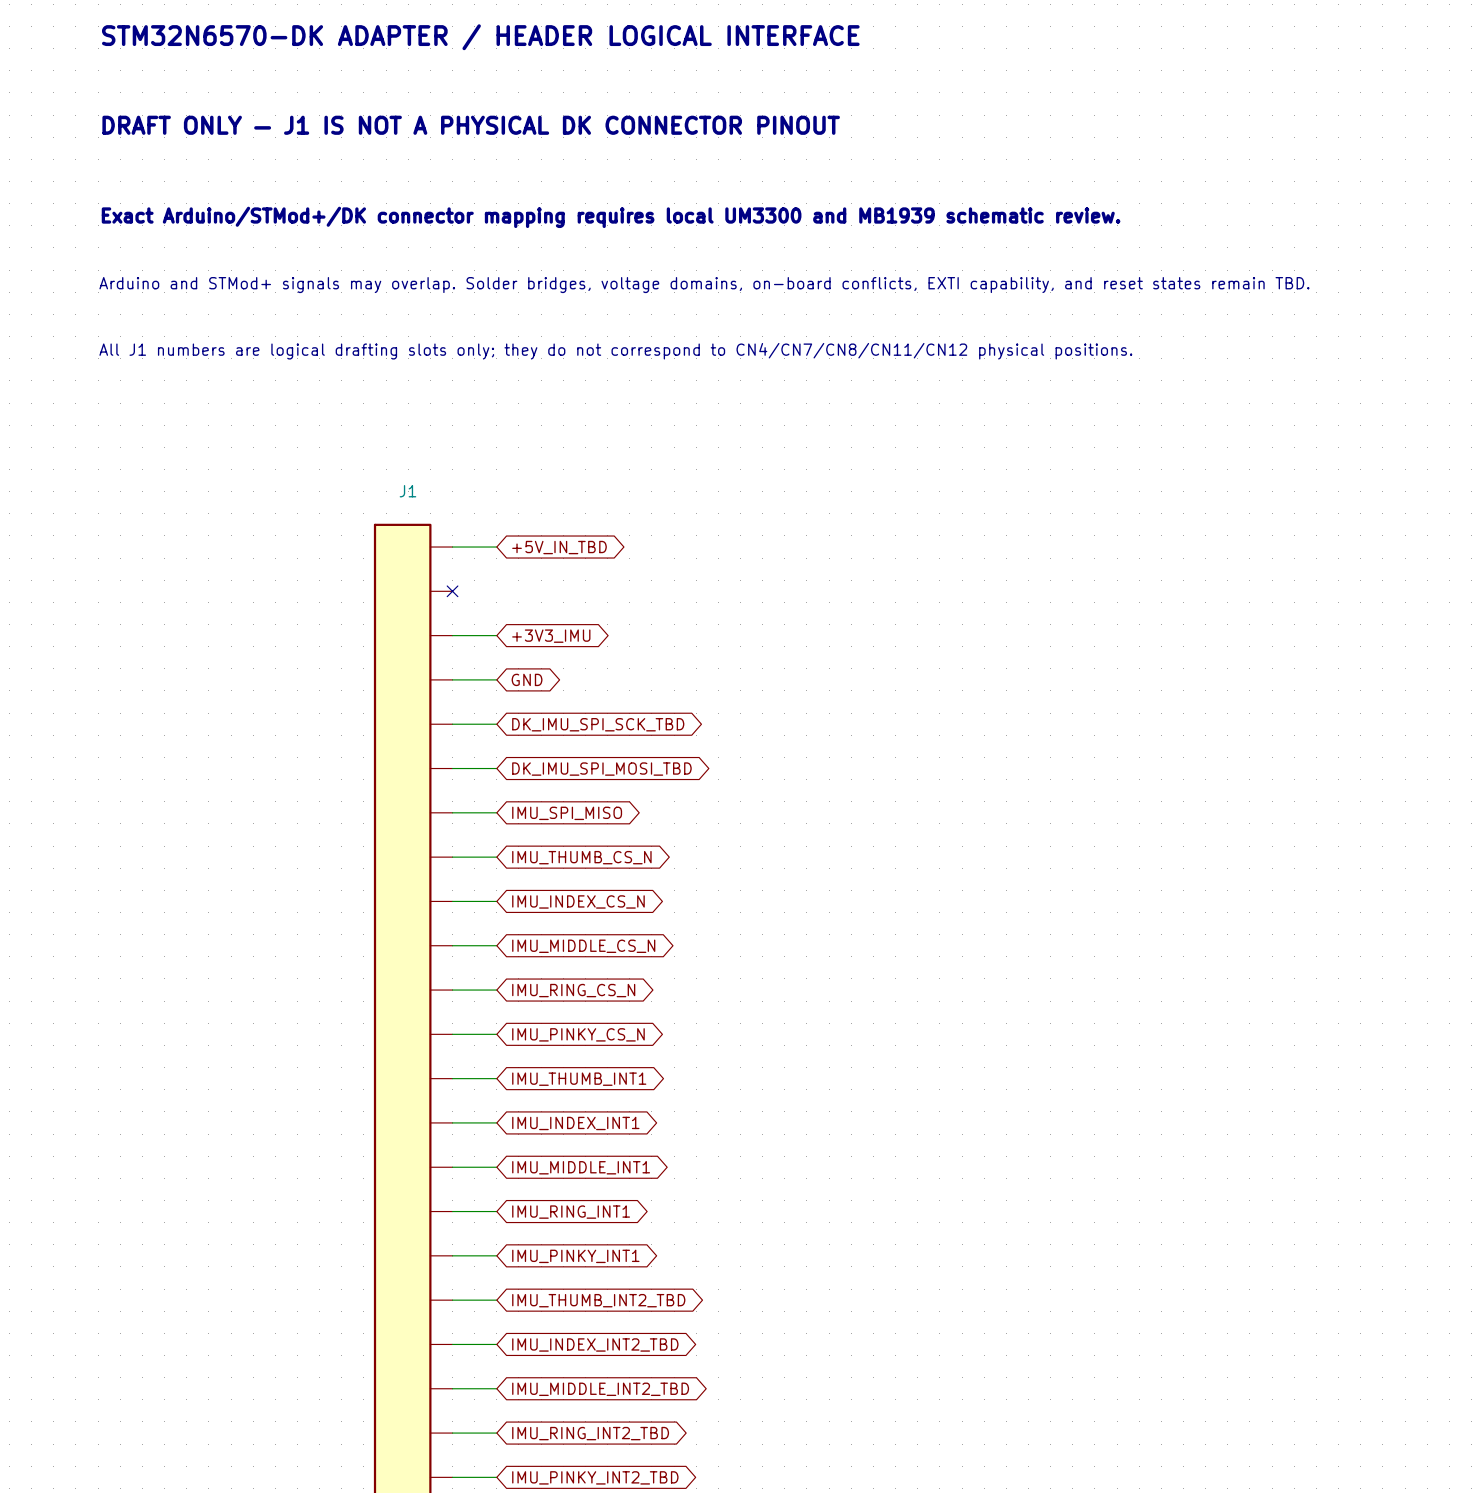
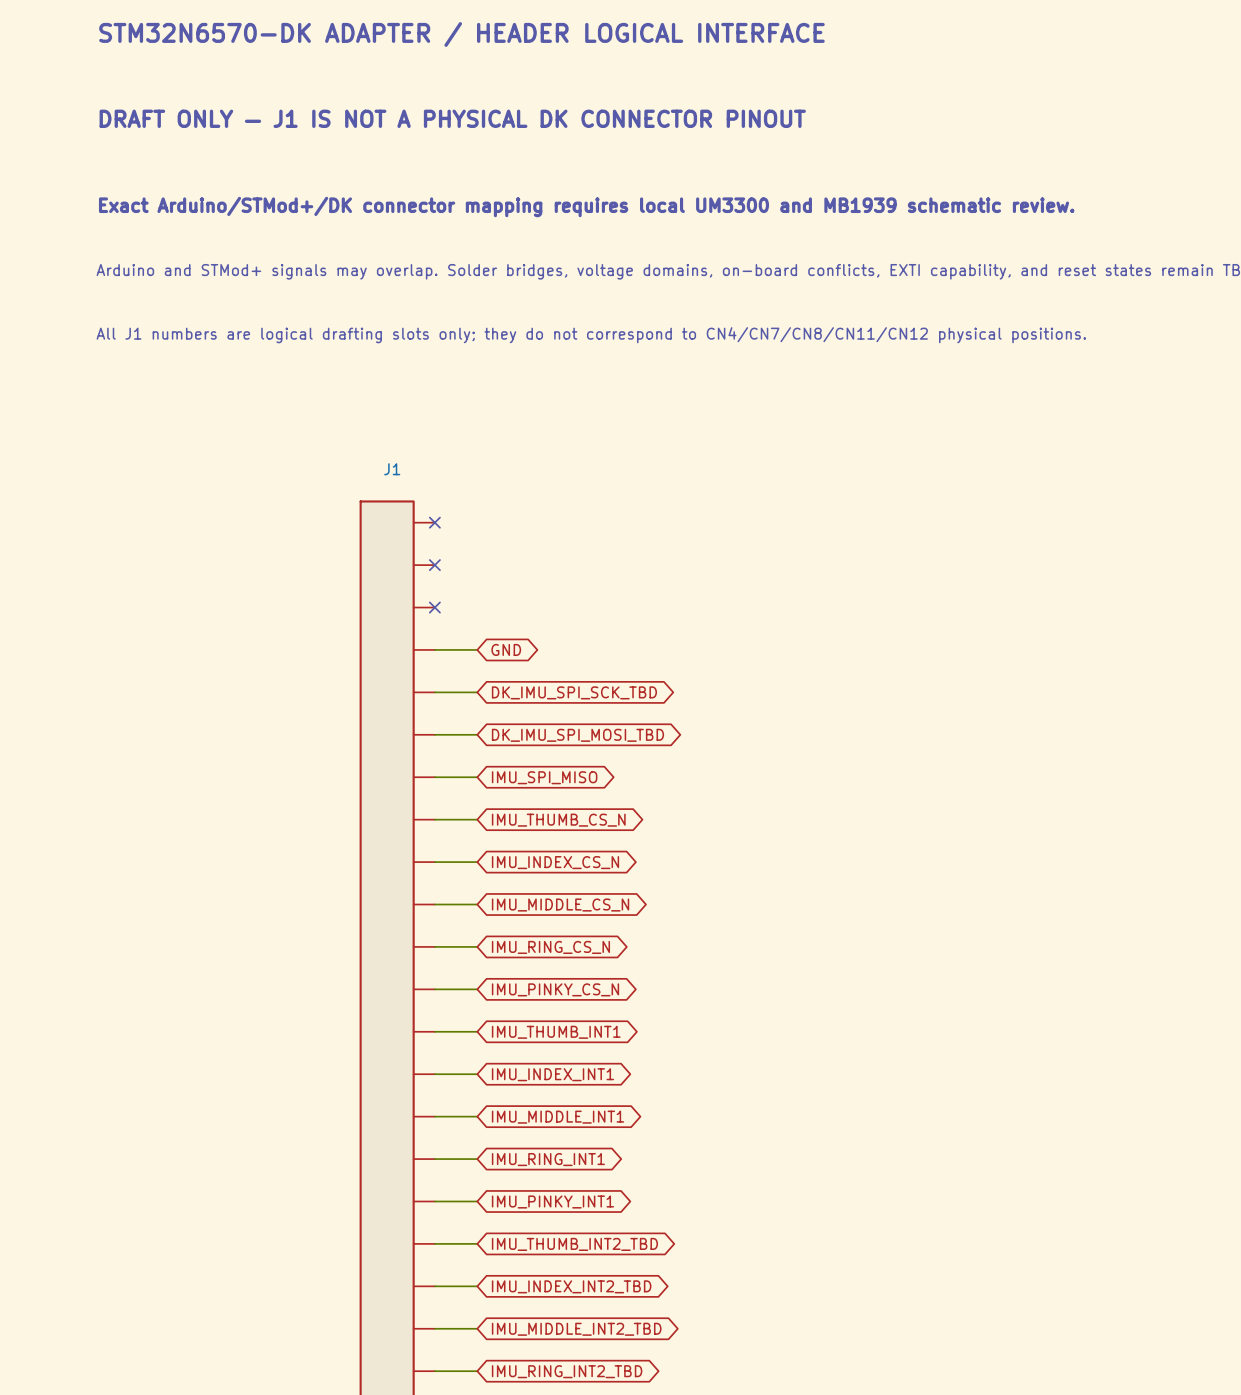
wire: (452, 547) (496, 547) -> none
no-connect mark: none -> (434, 522)
global label: +5V_IN_TBD (559, 547) -> none
wire: (452, 635) (496, 635) -> none
no-connect mark: none -> (434, 607)
global label: +3V3_IMU (551, 636) -> none

